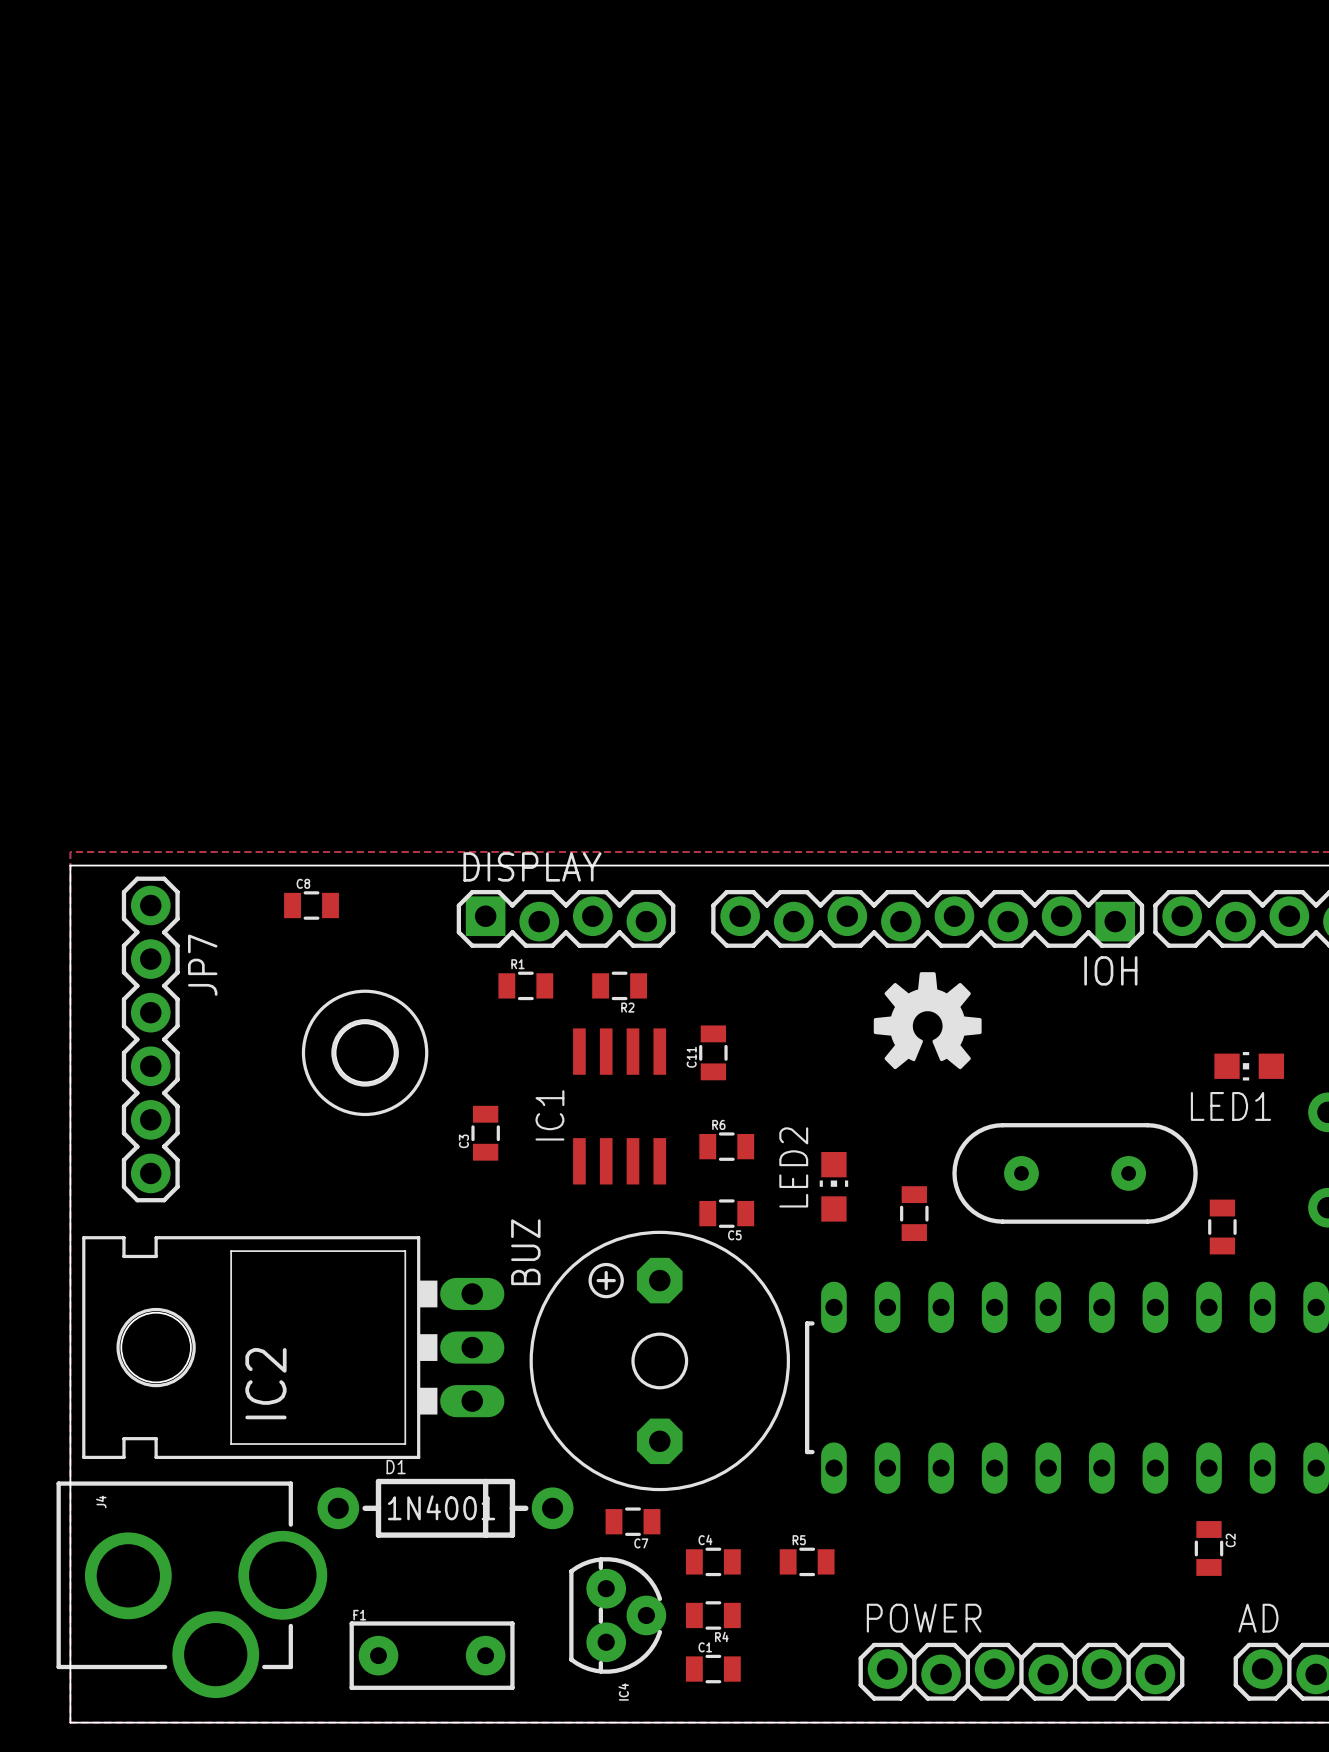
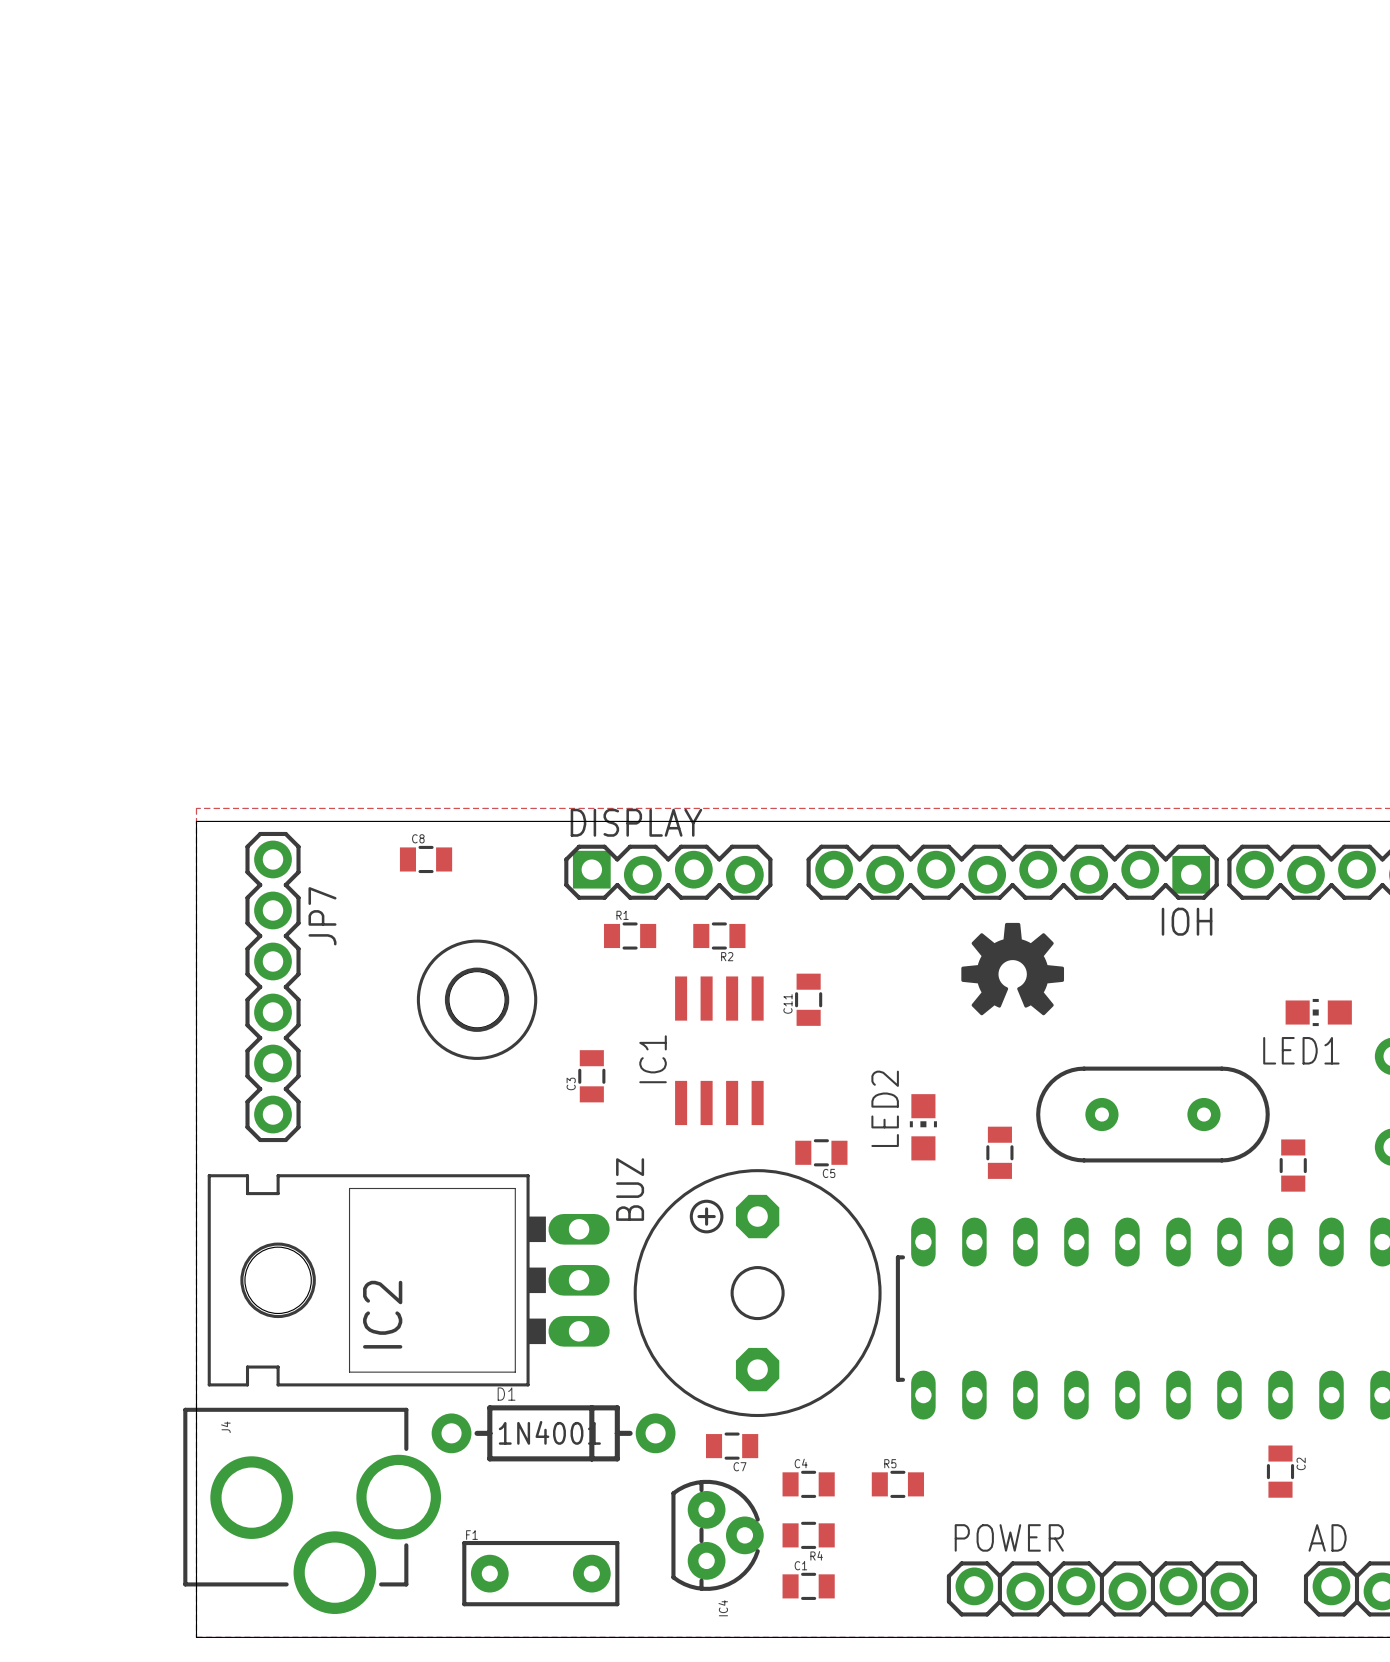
R6: (726, 1146) -> none

